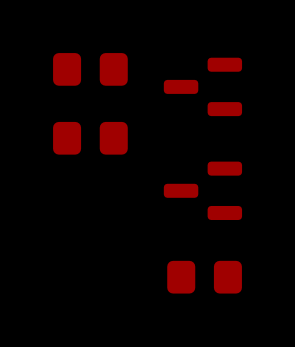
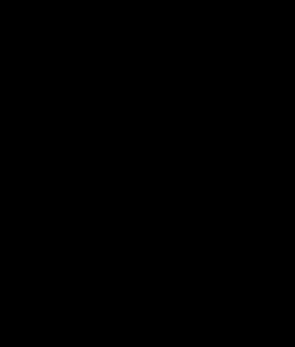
part: (90, 69) -> none
part: (202, 86) -> none
part: (90, 138) -> none
part: (202, 190) -> none
part: (204, 277) -> none

